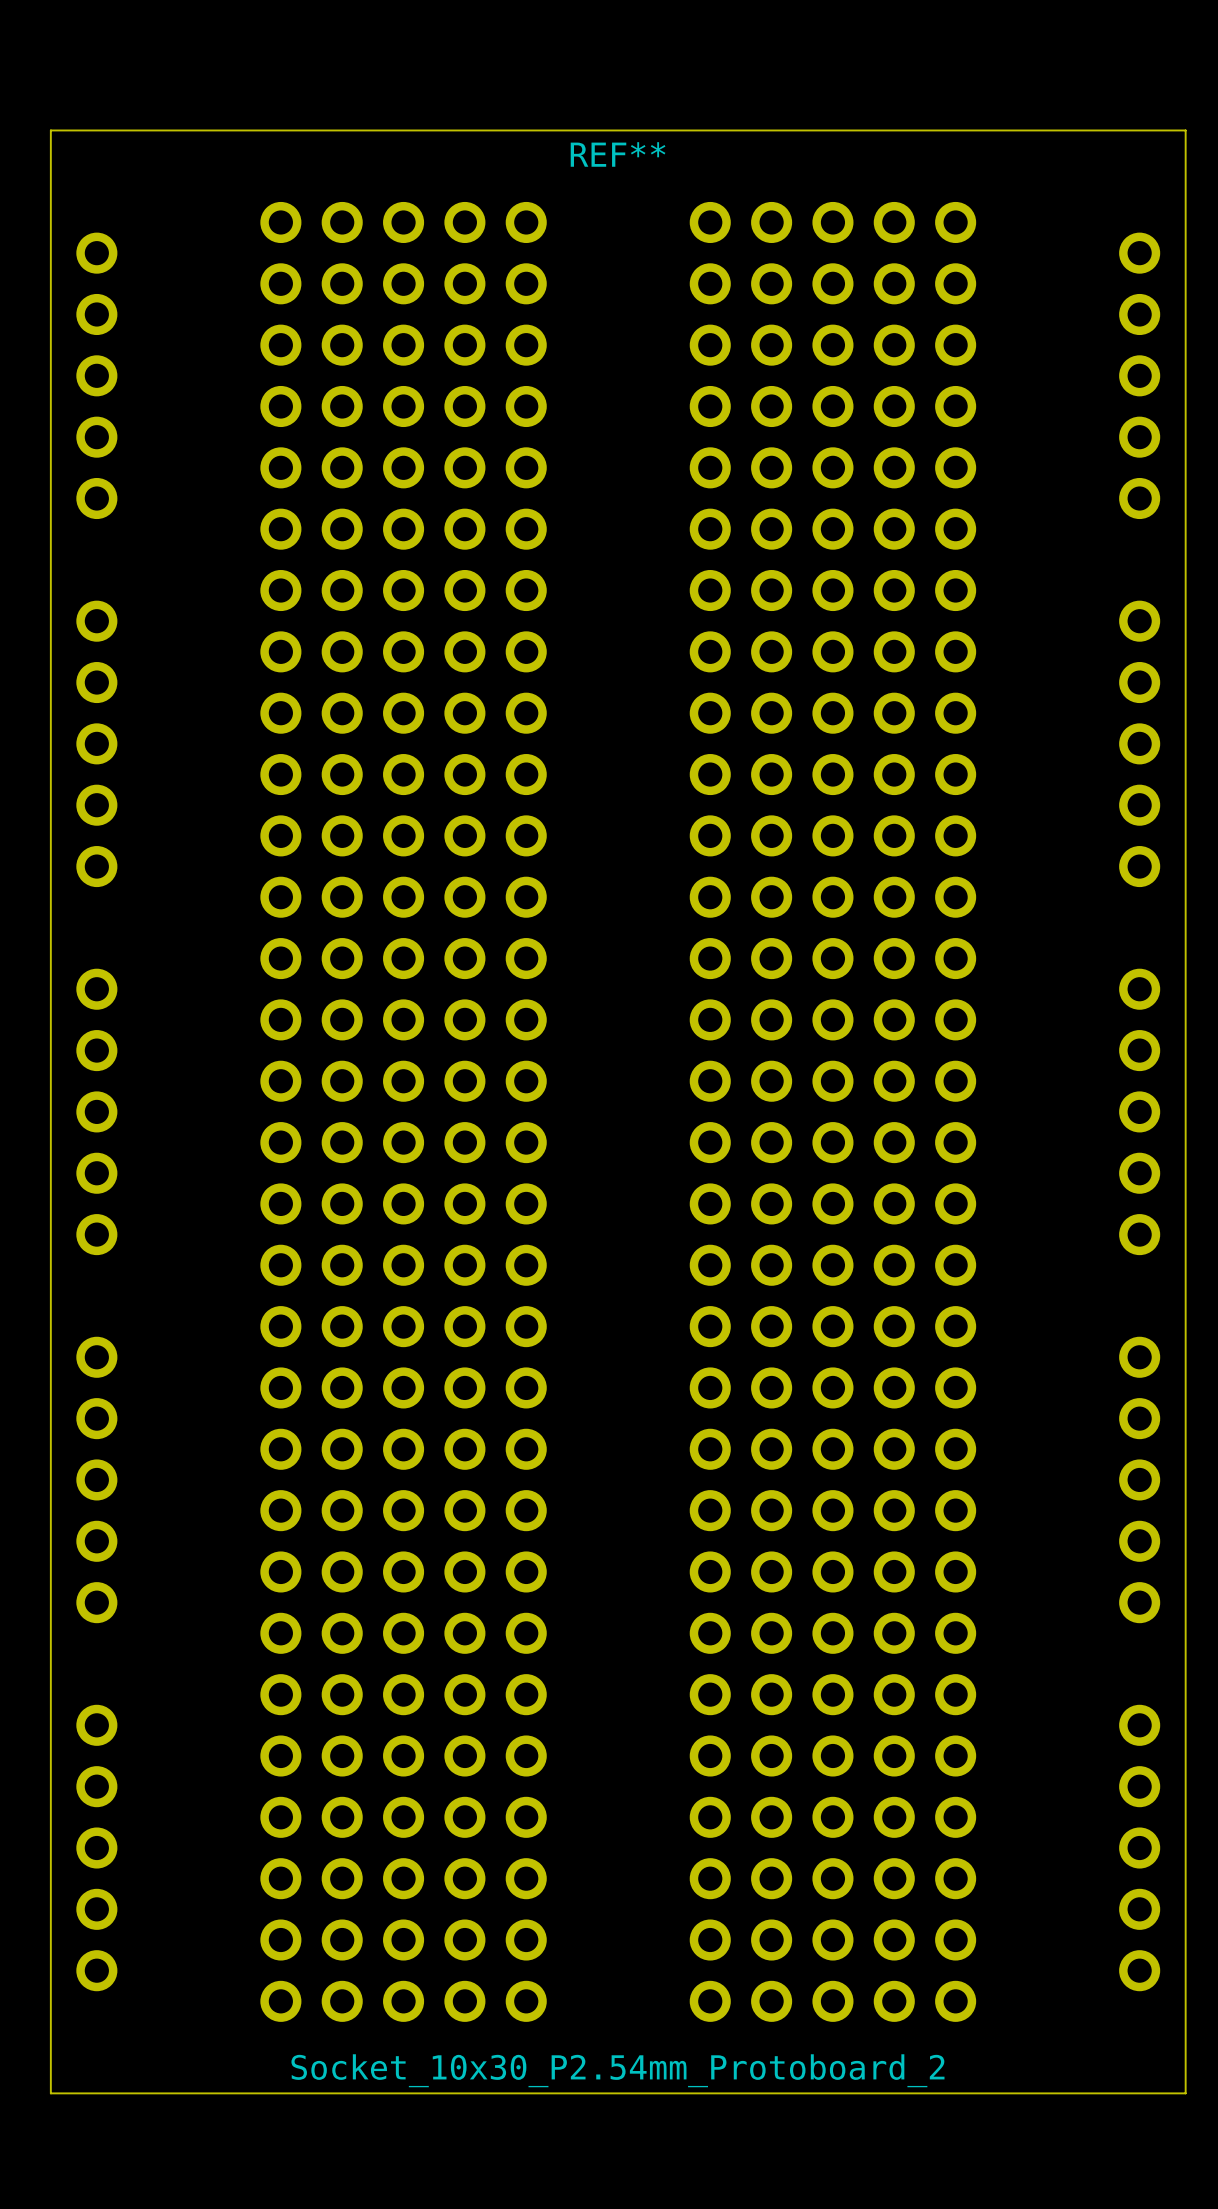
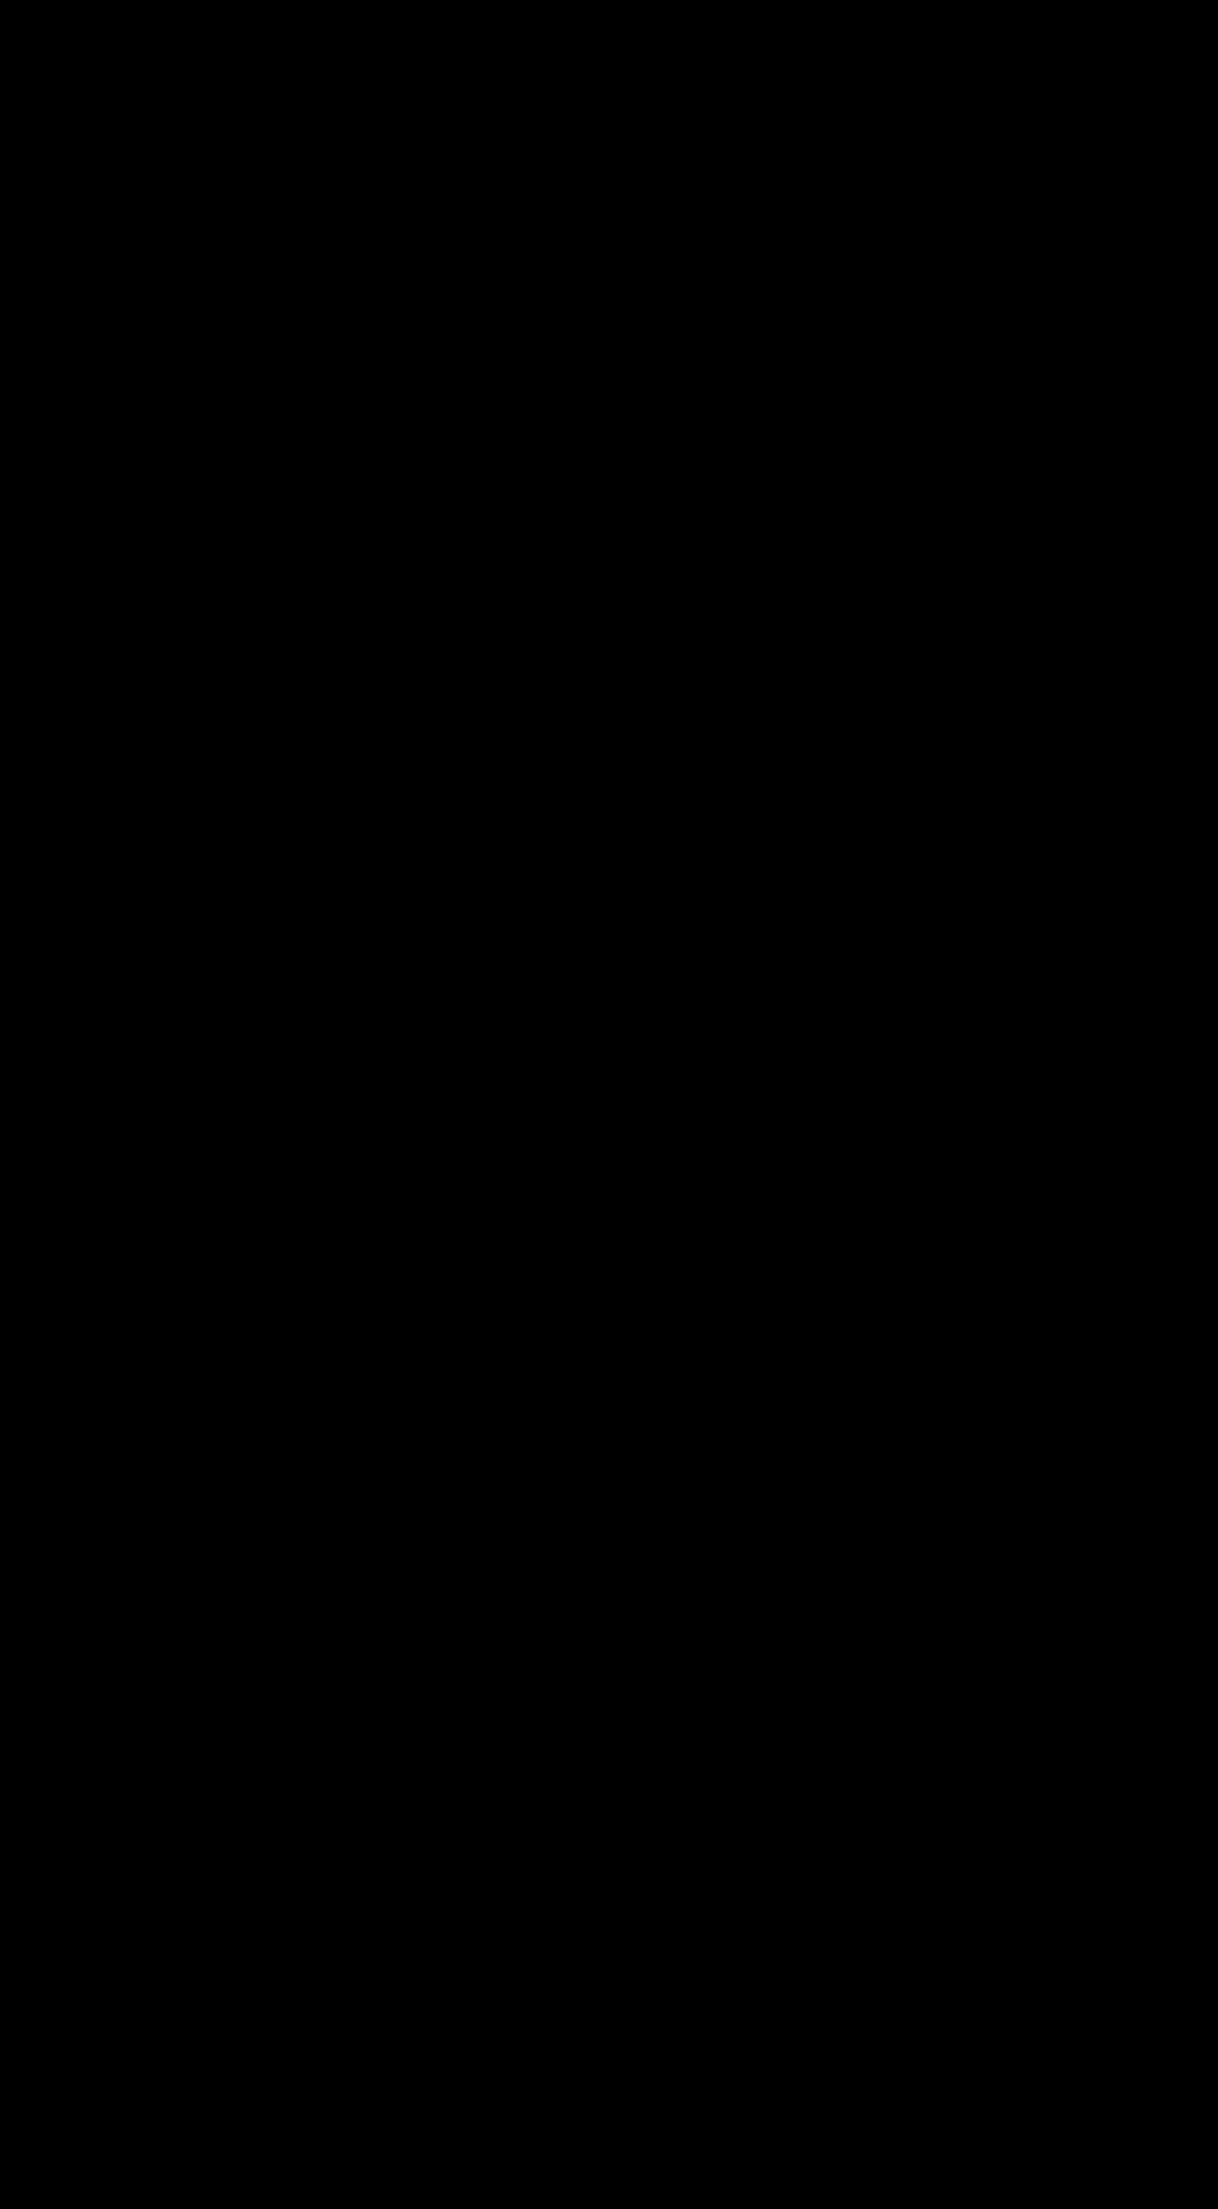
board edge: (50, 130) (1185, 130) (1185, 2093) (50, 2093) (50, 130) -> none
REF**: Socket_10x30_P2.54mm_Protoboard_2 (618, 1111) -> none

